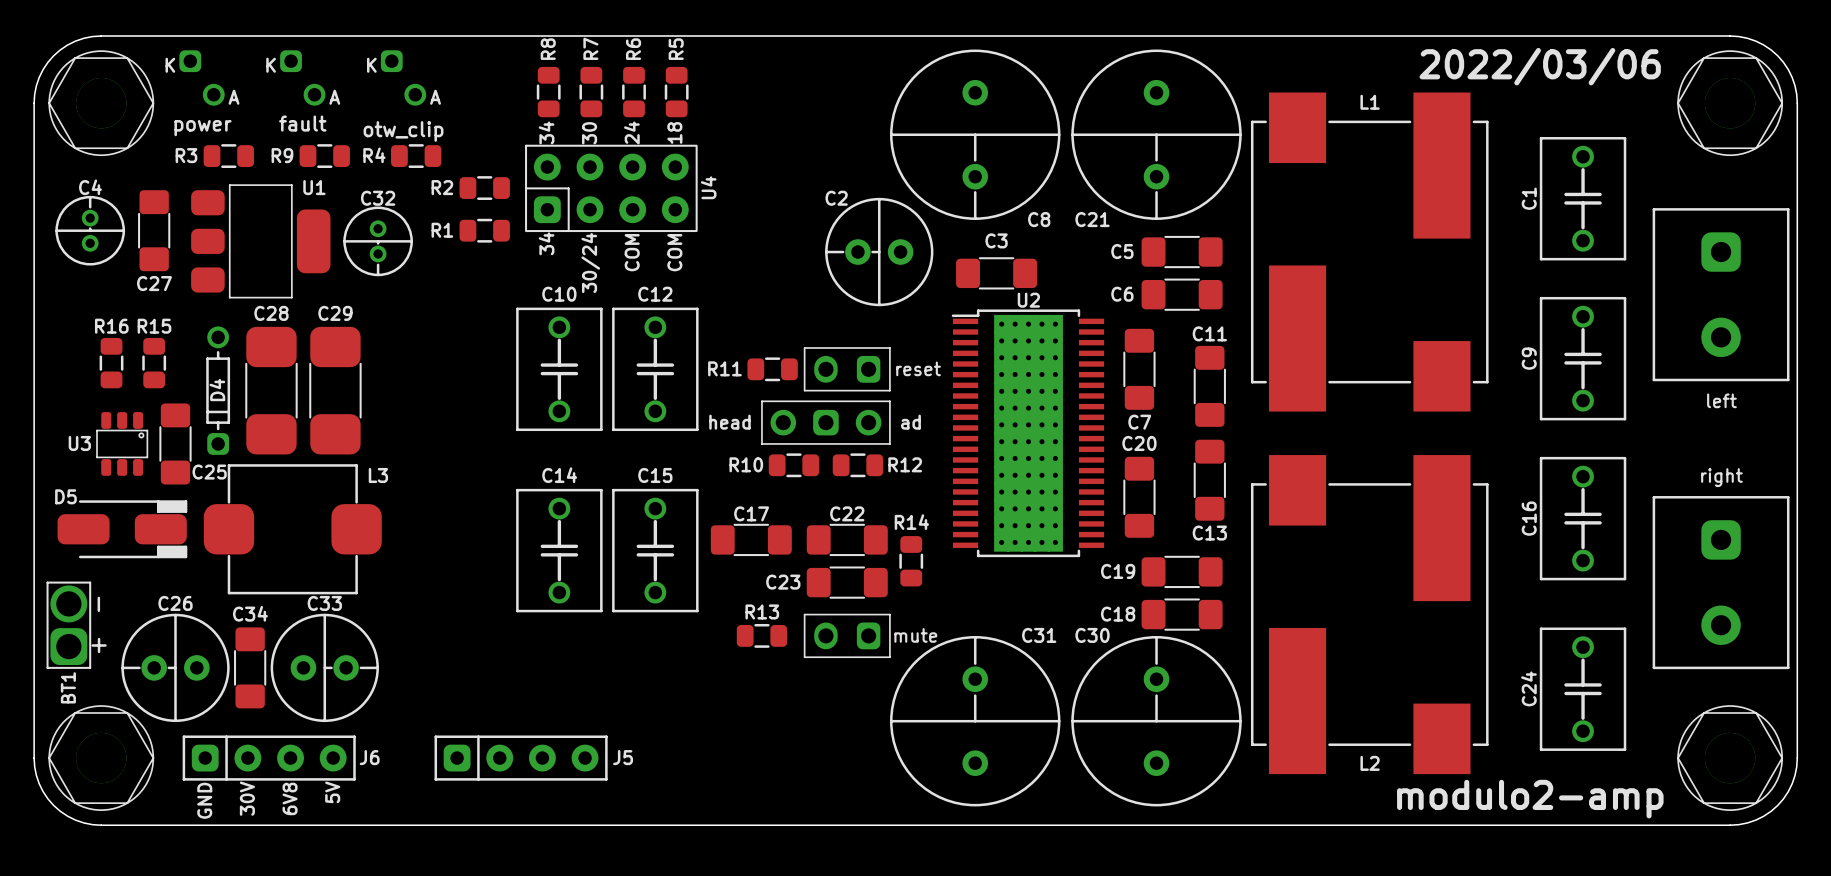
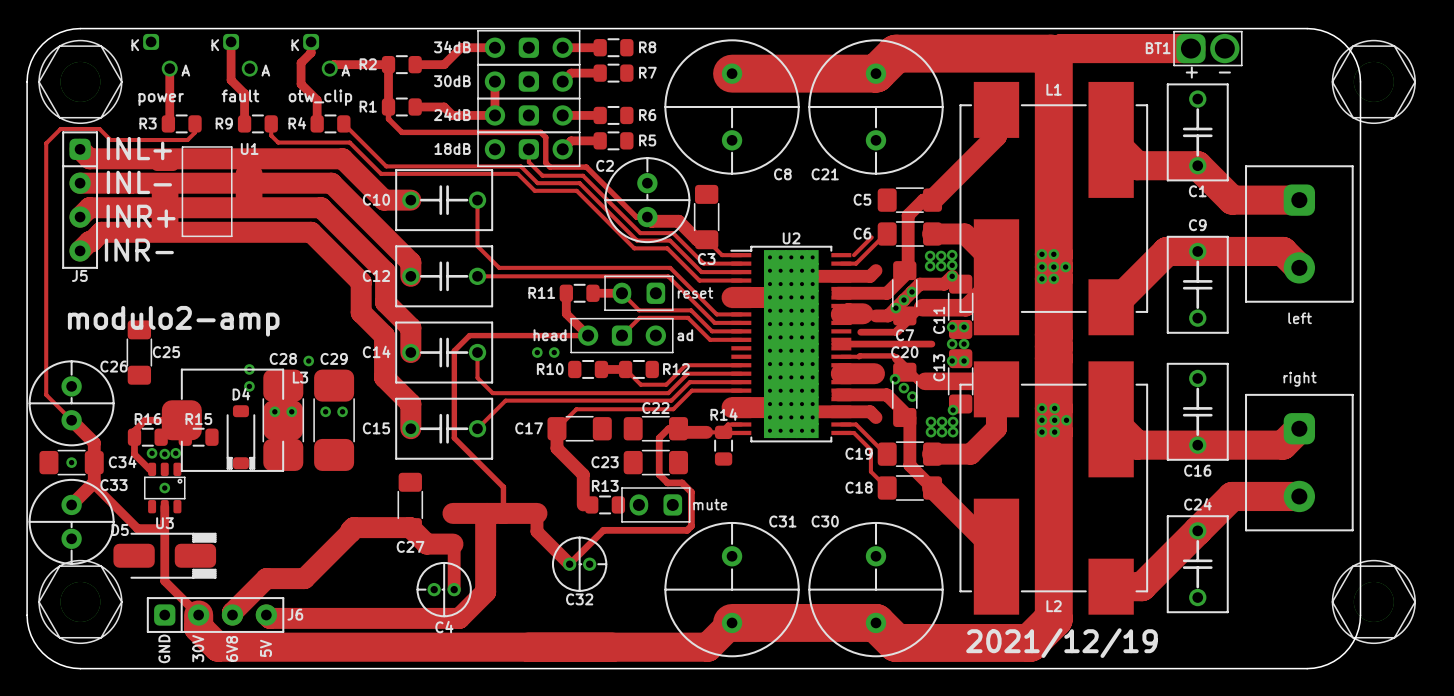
board edge: (1646, 36) (1730, 36) (1755, 41) (1771, 49) (1783, 62) (1792, 77) (1796, 94) (1797, 758) (1795, 775) (1788, 791) (1777, 805) (1755, 820) (1730, 825) (101, 825) (75, 820) (53, 805) (39, 783) (34, 758) -> (1307, 28) (1327, 32) (1344, 44) (1356, 61) (1360, 81) (1360, 615) (1358, 629) (1349, 647) (1339, 657) (1327, 664) (1307, 668) (80, 668) (66, 666) (53, 661) (38, 647) (28, 629) (27, 601)
part footprint: [179, 50, 225, 106] -> [143, 33, 178, 77]
part footprint: [280, 50, 326, 106] -> [223, 33, 258, 77]
part footprint: [380, 50, 427, 106] -> [303, 33, 338, 77]
track: none -> (231, 41) (231, 80) (244, 93) (244, 123)
track: none -> (311, 41) (311, 52) (301, 62) (301, 84) (317, 100) (317, 123)
track: none -> (494, 47) (461, 47) (444, 64) (415, 64)
part: none -> 34dB (528, 47)
track: none -> (562, 47) (600, 47)
track: none -> (1190, 48) (1061, 48) (1053, 56)
text: 2022/03/06 (1540, 66) -> none
track: none -> (1053, 56) (1053, 618) (1029, 642) (896, 642) (875, 622) (732, 622) (707, 647) (218, 647) (198, 627) (198, 615) (164, 581) (164, 506)
track: none -> (1053, 56) (1051, 53) (896, 53) (875, 73) (732, 73)
track: none -> (169, 68) (168, 123)
track: none -> (329, 68) (333, 64) (388, 64) (388, 119) (401, 132) (540, 132) (545, 137) (545, 162) (550, 167) (586, 167) (636, 217) (647, 217) (651, 221) (678, 221) (697, 239) (706, 239) (722, 255) (741, 255)
R8 rotation: 0° (548, 92) -> 90° clockwise (613, 47)
R8 position: (548, 92) -> (613, 47)
R7 rotation: 0° (591, 92) -> 90° clockwise (613, 73)
R7 position: (591, 92) -> (613, 73)
R6 rotation: 0° (634, 92) -> 90° clockwise (613, 115)
R6 position: (634, 92) -> (613, 115)
R5 rotation: 0° (676, 92) -> 90° clockwise (613, 140)
R5 position: (676, 92) -> (613, 140)
track: none -> (600, 73) (571, 73) (562, 81)
track: none -> (494, 81) (494, 115) (452, 115) (444, 106) (415, 106)
part: none -> 30dB (528, 81)
C8 position: (975, 134) -> (732, 106)
C21 position: (1156, 134) -> (875, 106)
C1 footprint: [1539, 137, 1627, 261] -> [1166, 83, 1229, 182]
track: none -> (996, 109) (996, 136) (932, 200) (923, 200) (908, 215) (908, 272) (887, 293) (837, 293)
part: none -> 24dB (528, 115)
track: none -> (562, 115) (600, 115)
track: none -> (195, 123) (195, 132) (187, 140) (110, 140) (99, 129) (60, 129) (46, 143) (46, 394) (94, 442) (94, 482)
track: none -> (271, 123) (271, 135) (278, 142) (349, 142) (381, 173) (517, 173) (534, 190) (576, 190) (634, 248) (667, 248) (699, 280) (741, 280)
track: none -> (343, 123) (386, 166) (520, 166) (537, 183) (579, 183) (637, 240) (670, 240) (701, 272) (741, 272)
track: none -> (1111, 139) (1136, 165) (1197, 165) (1232, 200) (1299, 200)
track: none -> (600, 140) (571, 140) (562, 149)
C4 name position: C4 (90, 187) -> C4 (444, 627)
text: none -> INL+ (139, 148)
track: none -> (80, 149) (89, 158) (342, 158) (384, 200) (410, 200)
R2 position: (484, 188) -> (401, 64)
U4: (611, 188) -> none
part: none -> 18dB (528, 149)
C32 name position: C32 (378, 198) -> C32 (579, 599)
track: none -> (528, 157) (528, 162) (542, 175) (583, 175) (640, 233) (673, 233) (703, 263) (741, 263)
C1 name position: C1 (1529, 198) -> C1 (1197, 191)
text: none -> INL- (139, 182)
C4 rotation: 0° (90, 230) -> 90° counterclockwise (444, 589)
C4 position: (90, 230) -> (444, 589)
track: none -> (80, 183) (331, 183) (410, 262) (410, 276)
C27 position: (154, 230) -> (410, 504)
R1 position: (484, 230) -> (401, 106)
C3 name position: C3 (996, 240) -> C3 (706, 259)
C32 rotation: 0° (378, 241) -> 90° counterclockwise (579, 564)
C32 position: (378, 241) -> (579, 564)
track: none -> (477, 200) (477, 246) (499, 267) (670, 267) (716, 314) (741, 314)
C2 rotation: 0° (879, 252) -> 90° clockwise (647, 200)
C5 position: (1182, 252) -> (909, 200)
L1 position: (1369, 252) -> (1053, 208)
text: none -> INR+ (141, 216)
track: none -> (80, 217) (89, 207) (321, 207) (385, 272) (385, 302) (410, 327) (410, 352)
C3 rotation: 0° (996, 273) -> 90° clockwise (706, 217)
C3 position: (996, 273) -> (706, 217)
C10 name position: C10 (559, 294) -> C10 (376, 199)
C12 name position: C12 (655, 294) -> C12 (376, 275)
track: none -> (887, 233) (856, 263) (841, 263)
track: none -> (932, 233) (964, 233) (996, 265) (996, 277) (966, 307) (922, 307)
C6 position: (1182, 294) -> (909, 233)
part position: (1721, 294) -> (1299, 233)
C9 footprint: [1539, 296, 1627, 421] -> [1166, 235, 1229, 334]
track: none -> (871, 237) (853, 255)
C10 footprint: [516, 307, 603, 432] -> [395, 169, 494, 232]
C12 footprint: [612, 307, 699, 432] -> [395, 245, 494, 308]
text: none -> INR- (139, 250)
track: none -> (80, 250) (101, 232) (311, 232) (361, 282) (361, 312) (384, 335) (384, 377) (410, 403) (410, 428)
via: none -> (1041, 254)
via: none -> (1053, 254)
via: none -> (952, 255)
via: none -> (930, 256)
via: none -> (941, 256)
D4 footprint: [206, 326, 231, 455] -> [226, 405, 256, 470]
C11 name rotation: 0° (1209, 333) -> 90° counterclockwise (939, 320)
C11 name position: C11 (1209, 333) -> C11 (939, 320)
via: none -> (952, 265)
via: none -> (930, 266)
via: none -> (941, 266)
via: none -> (1041, 267)
via: none -> (1053, 267)
via: none -> (1065, 267)
track: none -> (1299, 267) (1282, 251) (1166, 251) (1111, 307)
track: none -> (875, 270) (870, 276) (807, 276) (801, 270)
track: none -> (477, 276) (668, 276) (714, 322) (741, 322)
track: none -> (952, 276) (944, 284) (919, 284) (888, 315) (841, 314)
via: none -> (952, 276)
via: none -> (1041, 278)
via: none -> (1053, 278)
C9 name position: C9 (1529, 358) -> C9 (1197, 225)
R16 rotation: 0° (111, 363) -> 90° clockwise (147, 437)
R16 position: (111, 363) -> (147, 437)
R15 rotation: 0° (154, 363) -> 90° clockwise (198, 437)
R15 position: (154, 363) -> (198, 437)
via: none -> (911, 291)
track: none -> (566, 293) (566, 313) (588, 335) (469, 335) (454, 350) (454, 438) (503, 487) (503, 513)
track: none -> (592, 293) (621, 293) (639, 310) (691, 310) (712, 331) (741, 331)
R11 position: (772, 369) -> (579, 293)
part position: (847, 369) -> (638, 293)
track: none -> (732, 297) (769, 297)
via: none -> (903, 300)
track: none -> (921, 306) (895, 332) (860, 332)
via: none -> (895, 308)
D4 name position: D4 (217, 390) -> D4 (241, 394)
C28 position: (271, 390) -> (283, 420)
C29 position: (335, 390) -> (334, 420)
text: none -> modulo2-amp (173, 321)
via: none -> (952, 327)
via: none -> (964, 327)
text position: head (729, 422) -> head (550, 335)
track: none -> (621, 335) (639, 317) (688, 317) (710, 339) (741, 339)
part position: (825, 422) -> (621, 335)
text position: ad (910, 422) -> ad (685, 335)
U2 position: (1027, 433) -> (790, 344)
track: none -> (834, 344) (931, 344)
via: none -> (952, 344)
via: none -> (964, 344)
U3 name position: U3 (79, 443) -> U3 (164, 523)
U3 position: (122, 443) -> (164, 488)
via: none -> (537, 352)
via: none -> (554, 352)
track: none -> (841, 356) (893, 355) (919, 381) (988, 381) (996, 389) (996, 428) (970, 454) (932, 454)
via: none -> (308, 361)
track: none -> (477, 361) (477, 377)
via: none -> (952, 361)
via: none -> (964, 361)
C16 footprint: [1539, 456, 1627, 581] -> [1166, 362, 1229, 461]
track: none -> (741, 365) (685, 365) (666, 384) (640, 384) (625, 369) (601, 369)
via: none -> (249, 369)
R10 position: (793, 465) -> (588, 369)
R12 position: (857, 465) -> (638, 369)
track: none -> (741, 373) (687, 373) (668, 393) (492, 393) (477, 377)
track: none -> (841, 373) (874, 373)
C25 name position: C25 (209, 472) -> C25 (166, 352)
C14 name position: C14 (559, 475) -> C14 (376, 351)
C15 name position: C15 (655, 475) -> C15 (376, 428)
via: none -> (895, 379)
track: none -> (741, 382) (689, 382) (671, 400) (505, 400) (477, 428)
via: none -> (249, 386)
C14 footprint: [516, 488, 603, 613] -> [395, 321, 494, 384]
C15 footprint: [612, 488, 699, 613] -> [395, 397, 494, 460]
via: none -> (903, 388)
track: none -> (741, 390) (691, 390) (673, 409) (576, 409) (556, 428) (556, 448) (583, 474) (583, 504)
track: none -> (837, 394) (886, 394) (909, 417) (909, 465) (996, 551) (996, 556)
via: none -> (912, 396)
track: none -> (780, 404) (777, 407) (732, 407)
C17 name position: C17 (751, 513) -> C17 (529, 428)
via: none -> (1041, 408)
via: none -> (1054, 408)
via: none -> (953, 410)
via: none -> (274, 411)
via: none -> (291, 411)
via: none -> (325, 411)
via: none -> (342, 411)
C16 name position: C16 (1529, 518) -> C16 (1197, 470)
track: none -> (801, 417) (807, 411) (870, 411) (875, 417)
track: none -> (1111, 419) (1136, 445) (1282, 445) (1299, 428)
D5 position: (122, 529) -> (164, 555)
via: none -> (1041, 420)
via: none -> (1054, 420)
via: none -> (1066, 420)
via: none -> (931, 421)
via: none -> (942, 421)
via: none -> (953, 421)
C13 name rotation: 0° (1209, 533) -> 90° counterclockwise (939, 367)
C13 name position: C13 (1209, 533) -> C13 (939, 367)
track: none -> (741, 424) (727, 424) (720, 432) (682, 432) (678, 428) (668, 428) (659, 438) (659, 474) (667, 482) (682, 482) (691, 492) (691, 526) (687, 530) (603, 530) (569, 564) (536, 531) (536, 513) (452, 513)
track: none -> (841, 424) (856, 424) (887, 454)
C17 position: (751, 539) -> (579, 428)
C22 position: (847, 539) -> (655, 428)
via: none -> (931, 432)
via: none -> (942, 432)
via: none -> (953, 432)
via: none -> (1041, 432)
via: none -> (1054, 432)
track: none -> (841, 432) (853, 432) (870, 449) (870, 471) (887, 488)
track: none -> (185, 437) (185, 430) (174, 420) (145, 420) (134, 431) (134, 454) (149, 469) (152, 469)
via: none -> (152, 453)
via: none -> (175, 453)
via: none -> (164, 454)
C19 position: (1182, 571) -> (909, 454)
BT1 footprint: [46, 581, 92, 669] -> [1173, 30, 1243, 67]
via: none -> (71, 462)
C23 position: (847, 582) -> (655, 462)
part position: (1721, 582) -> (1299, 462)
C26 name position: C26 (175, 603) -> C26 (113, 366)
C33 name position: C33 (324, 603) -> C33 (113, 485)
track: none -> (94, 482) (71, 504)
track: none -> (94, 482) (94, 485) (137, 528) (164, 528)
via: none -> (164, 488)
C18 position: (1182, 614) -> (909, 488)
L2 position: (1369, 614) -> (1053, 488)
track: none -> (1299, 496) (1232, 496) (1141, 586) (1111, 586)
C24 footprint: [1539, 627, 1627, 751] -> [1166, 515, 1229, 614]
part position: (847, 635) -> (655, 504)
track: none -> (486, 513) (485, 592) (459, 618) (269, 618) (266, 615)
C26 rotation: 0° (175, 667) -> 90° clockwise (71, 403)
C26 position: (175, 667) -> (71, 403)
C34 rotation: 0° (250, 667) -> 90° clockwise (71, 462)
C34 position: (250, 667) -> (71, 462)
C33 rotation: 0° (324, 667) -> 90° clockwise (71, 521)
C33 position: (324, 667) -> (71, 521)
BT1 name position: BT1 (68, 687) -> BT1 (1158, 48)
C24 name position: C24 (1528, 688) -> C24 (1197, 504)
C31 position: (975, 721) -> (732, 589)
C30 position: (1156, 721) -> (875, 589)
track: none -> (454, 589) (452, 544) (426, 544) (410, 527) (353, 527) (304, 578) (266, 578) (232, 612) (232, 615)
J6 position: (269, 758) -> (215, 615)
J5 rotation: 0° (521, 758) -> 90° clockwise (80, 200)
J5 position: (521, 758) -> (80, 200)
J6 text: 5V (332, 792) -> none
J6 text: 30V (247, 798) -> none
J6 text: 6V8 (290, 798) -> none
text: modulo2-amp (1530, 799) -> none
J6 text: GND (204, 800) -> none
text: none -> 2021/12/19 (1061, 643)
text: none -> 30V (198, 648)
text: none -> 5V (265, 648)
text: none -> GND (164, 648)
text: none -> 6V8 (232, 648)

